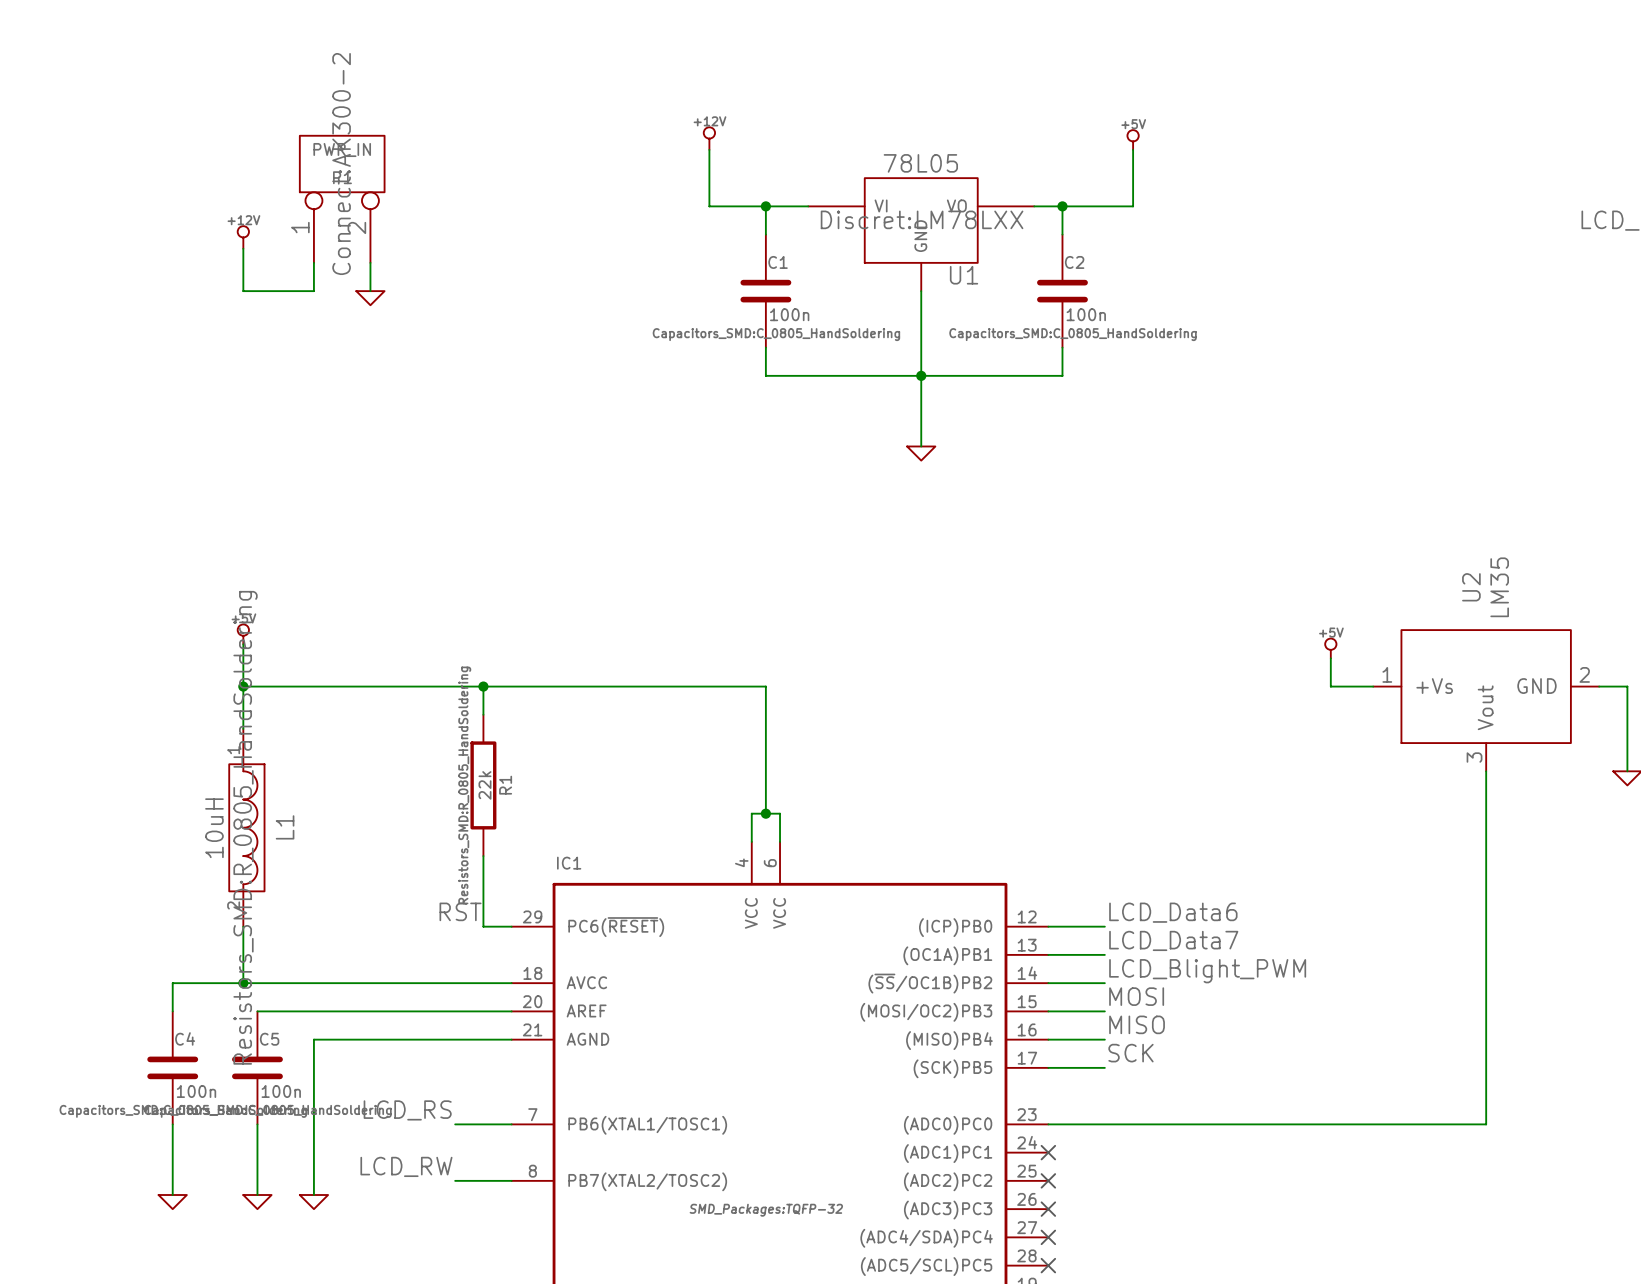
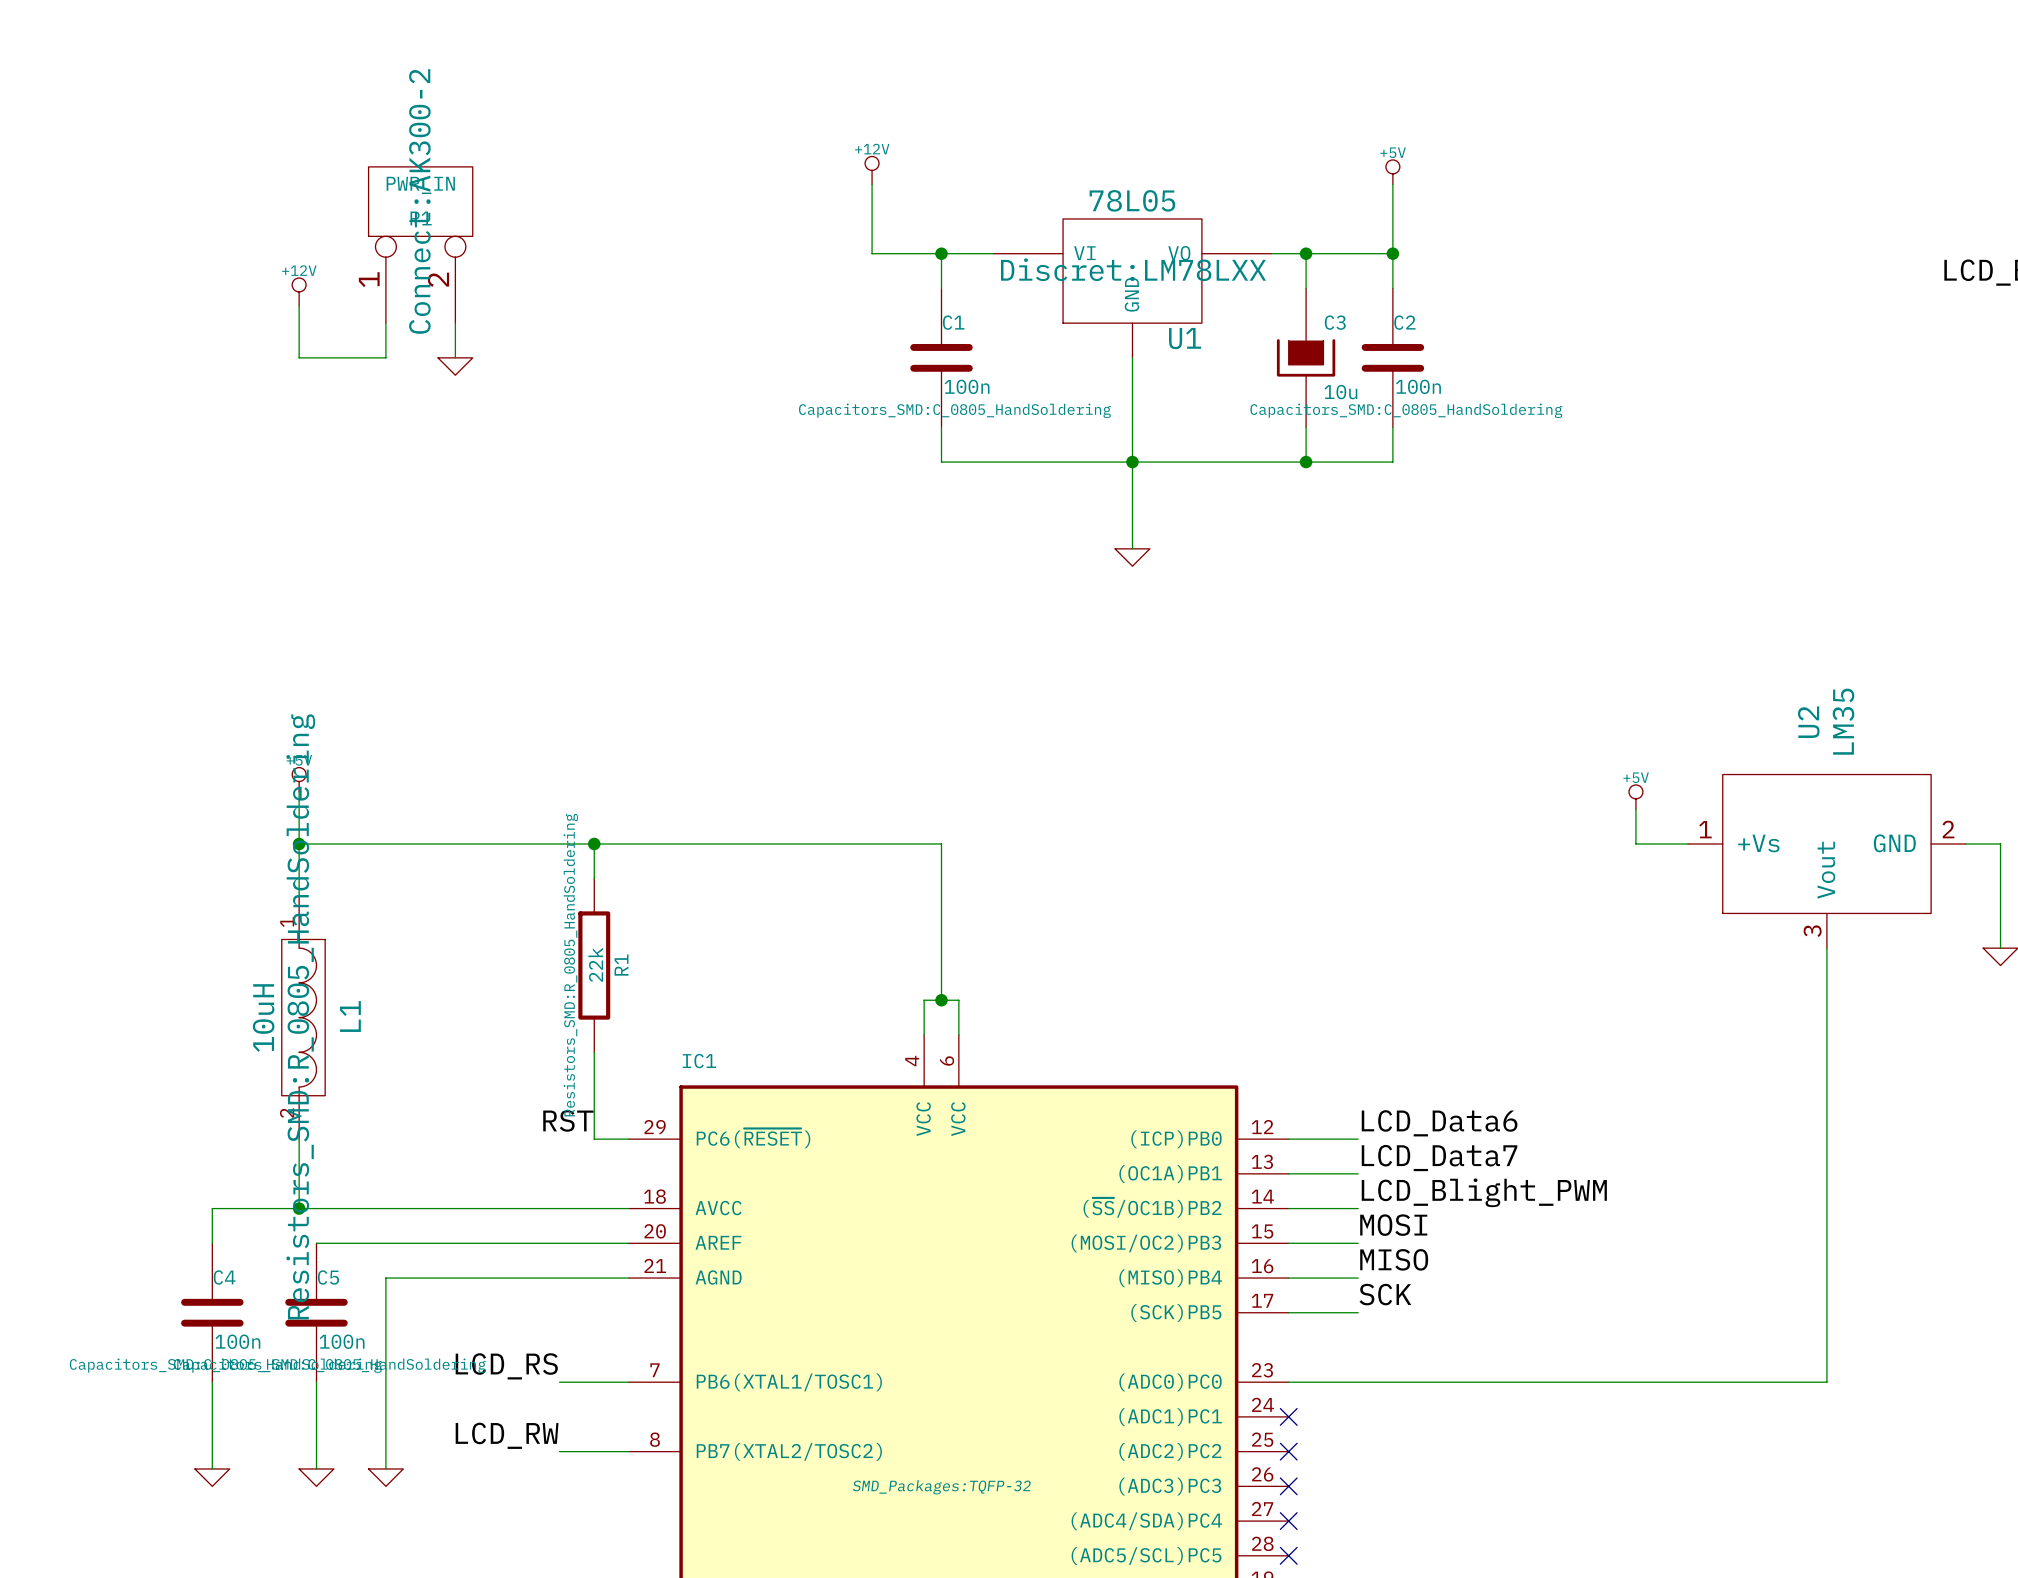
wire: none -> (1392, 253) (1392, 288)
junction: none -> (1392, 253)
C2 position: (1062, 291) -> (1392, 357)
C3: none -> 10u (1306, 357)
wire: none -> (1392, 427) (1392, 462) (1306, 462)
junction: none -> (1306, 462)

